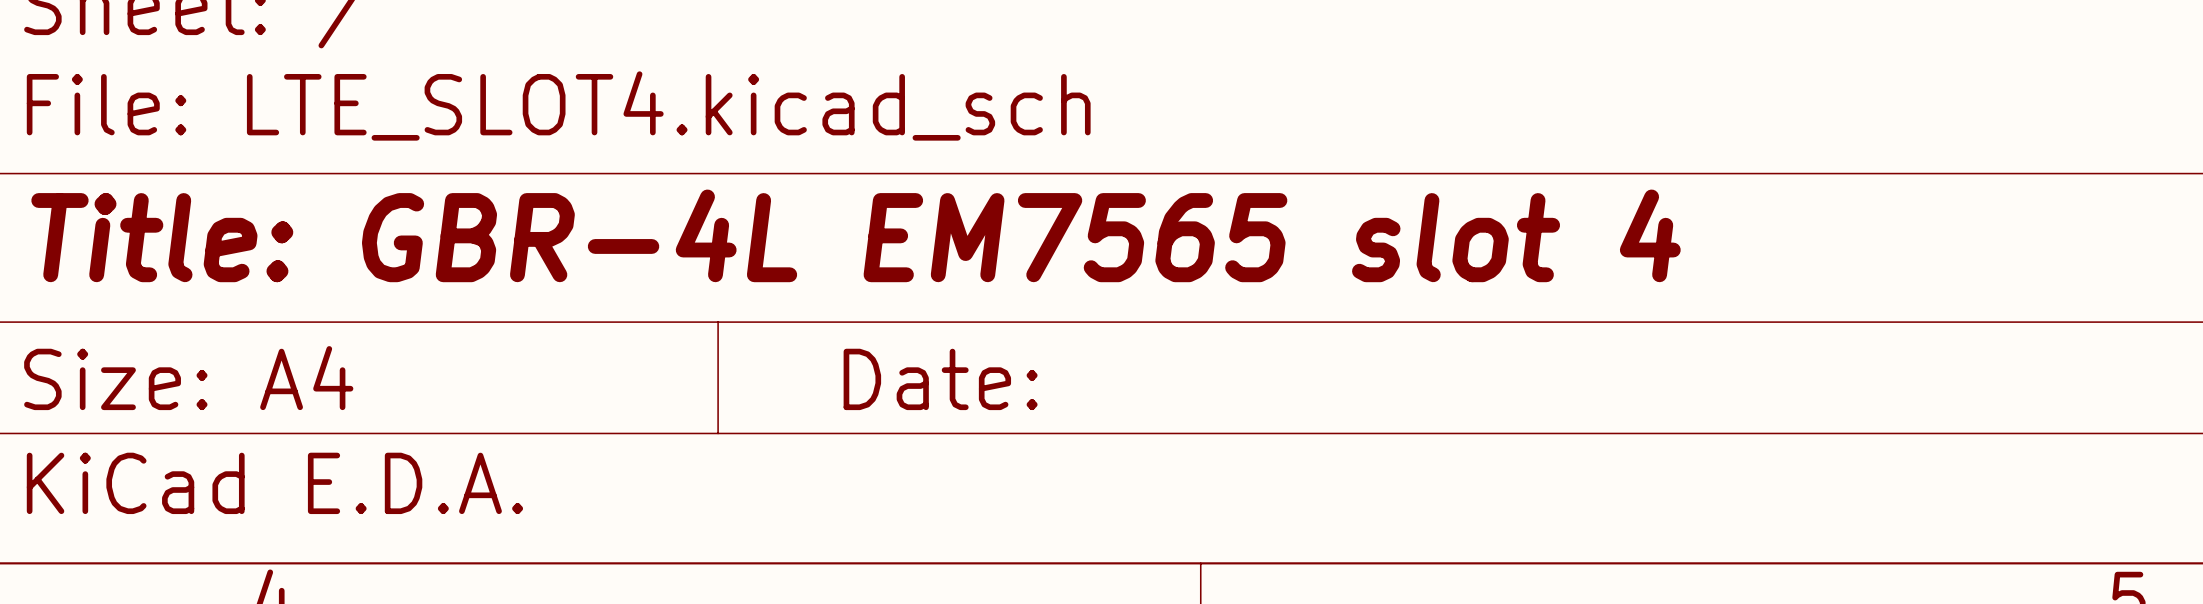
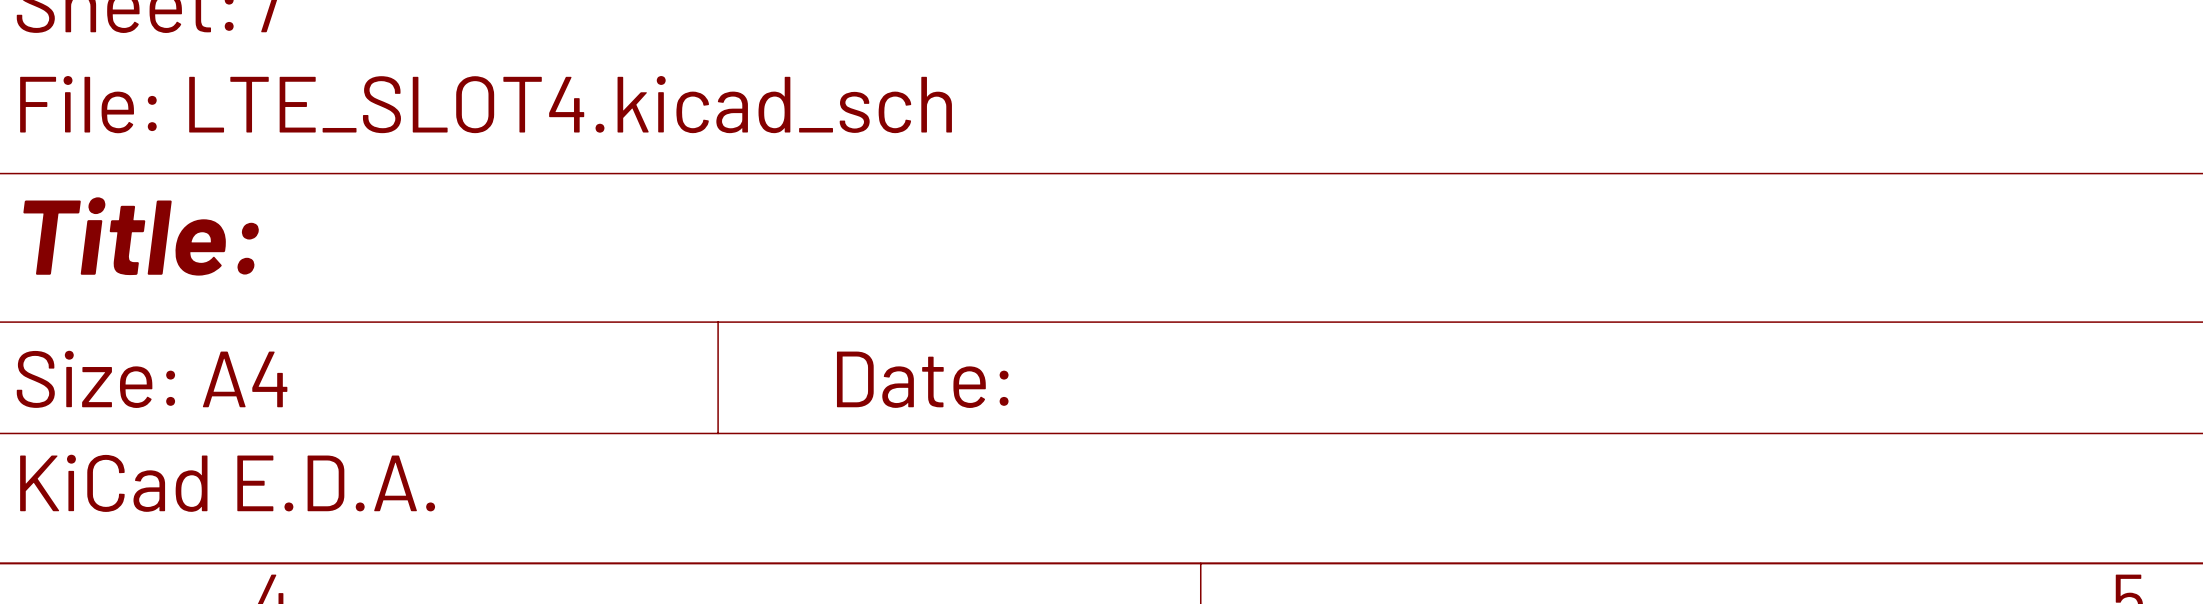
title block: Title: GBR-4L EM7565 slot 4 (856, 235) -> Title: (141, 236)

